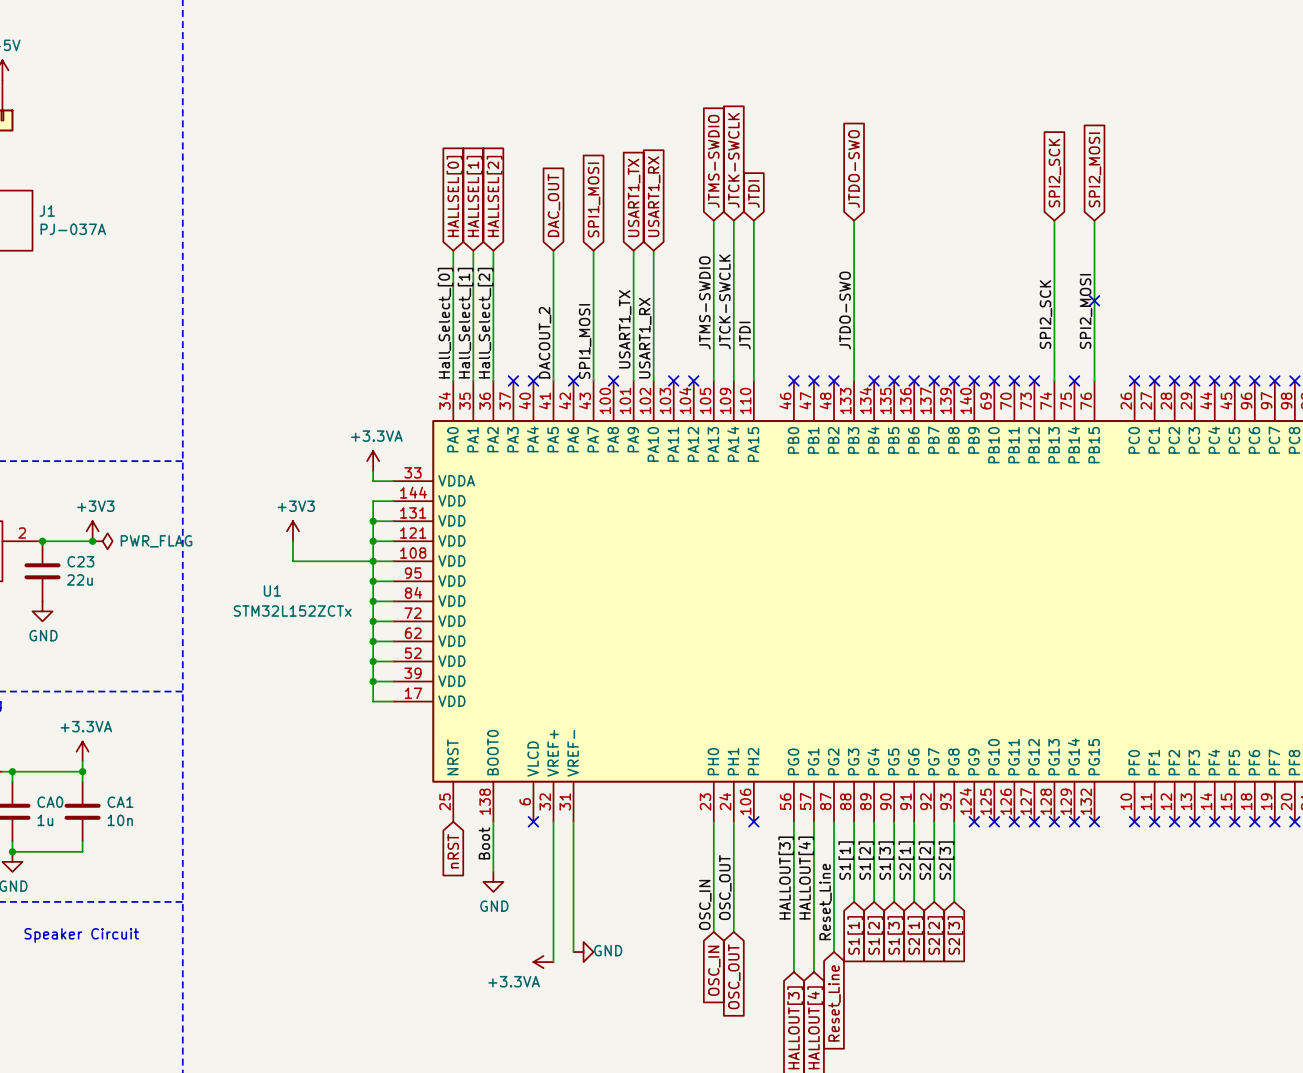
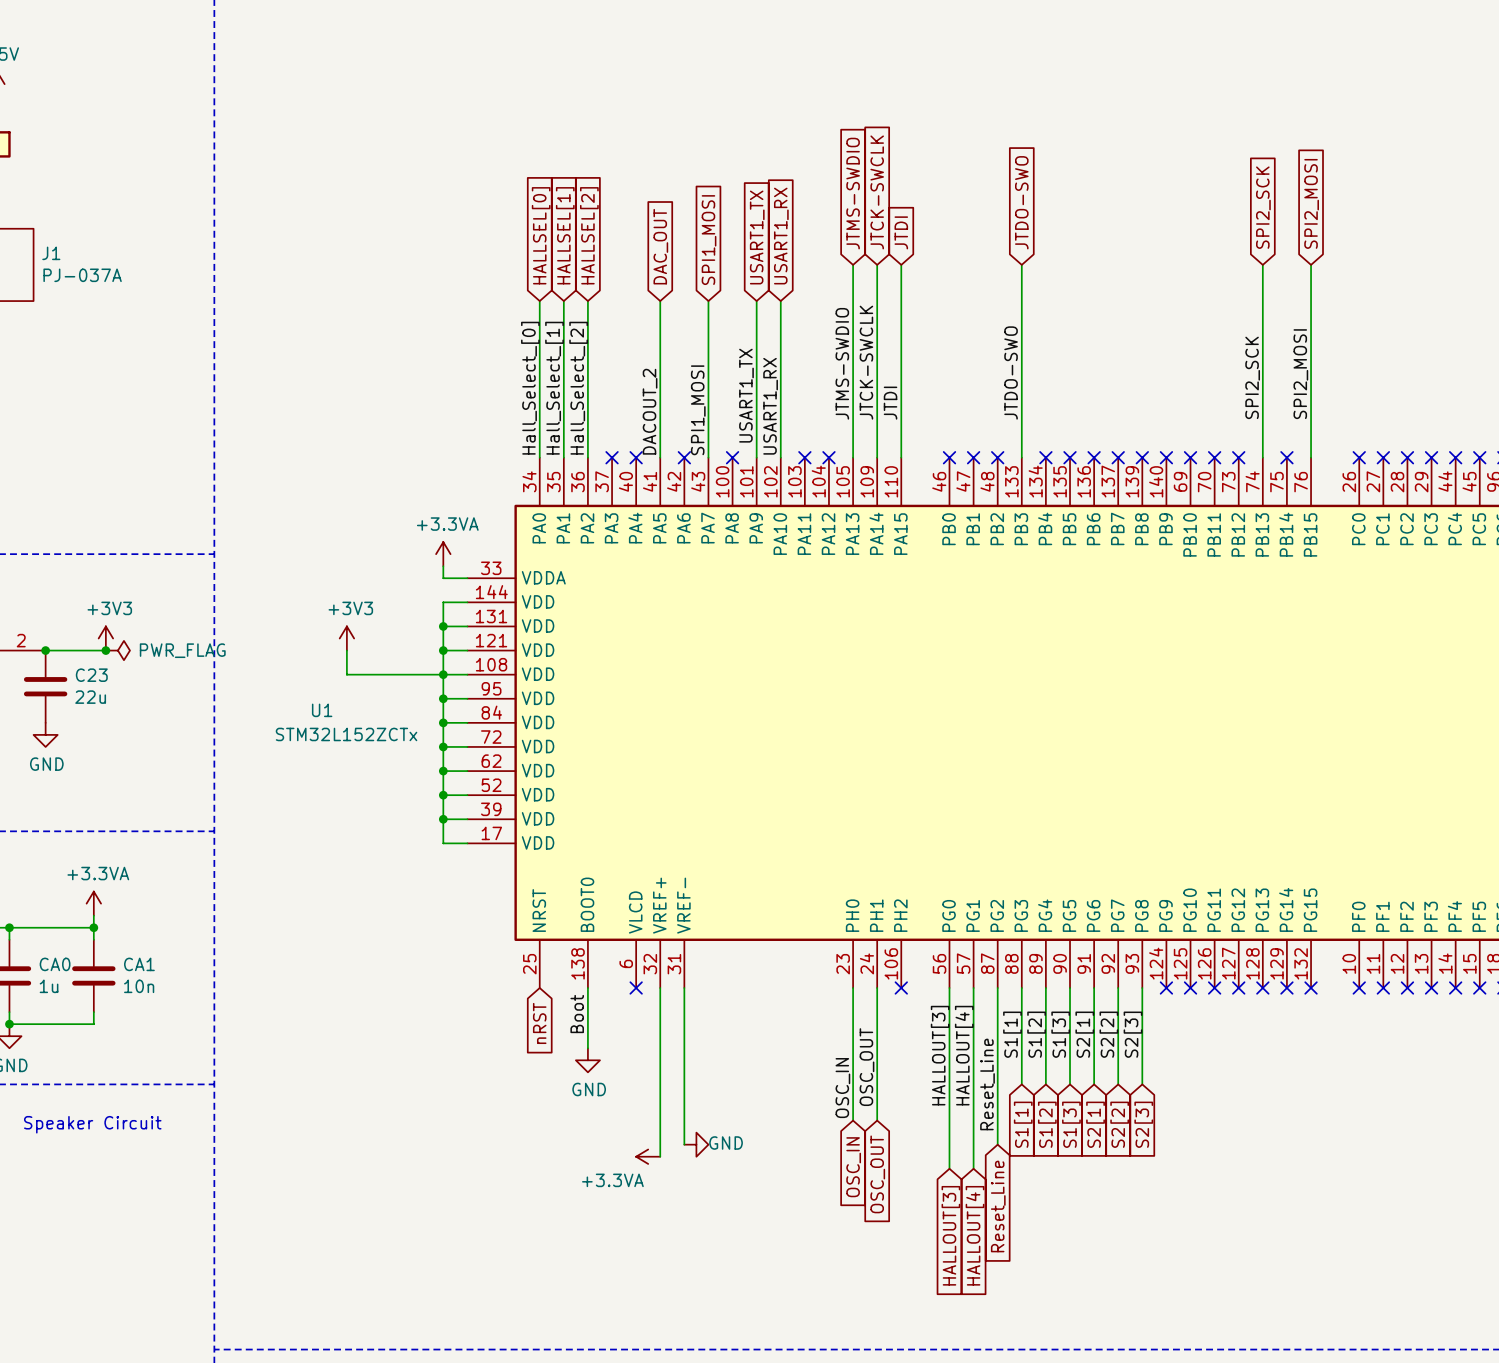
no-connect mark: (1094, 300) -> none

